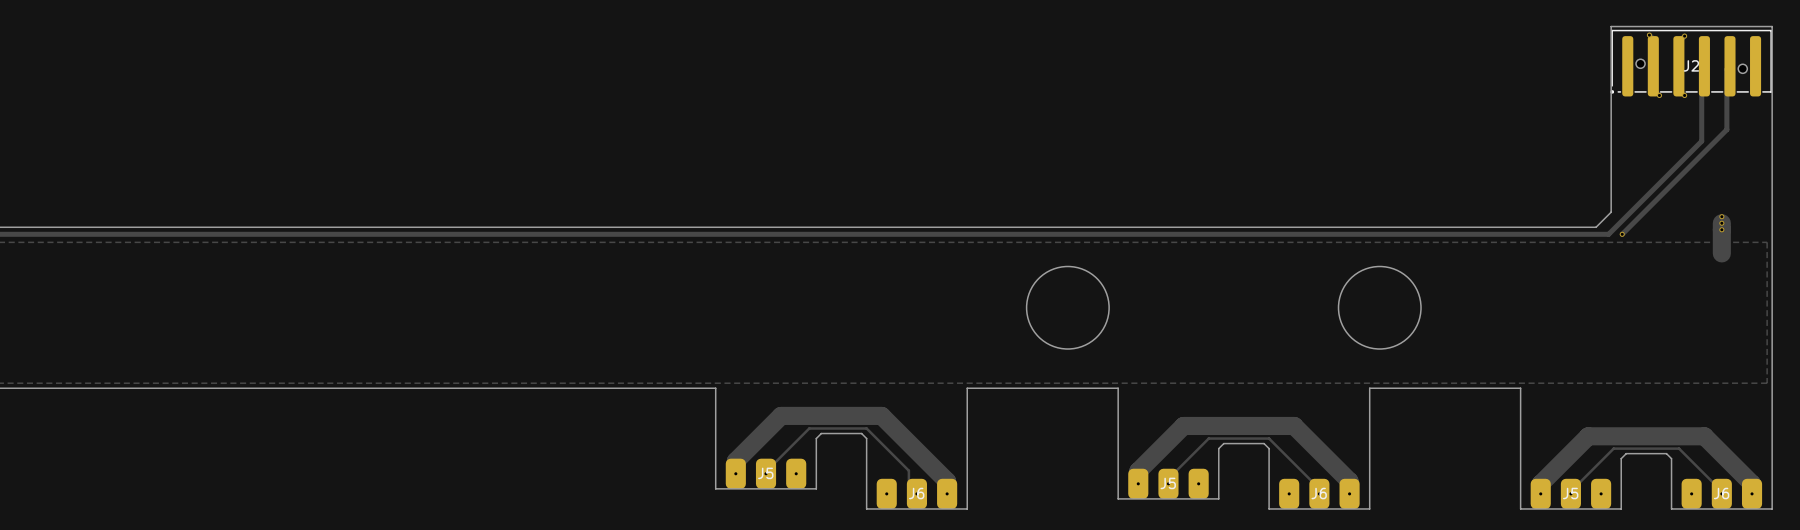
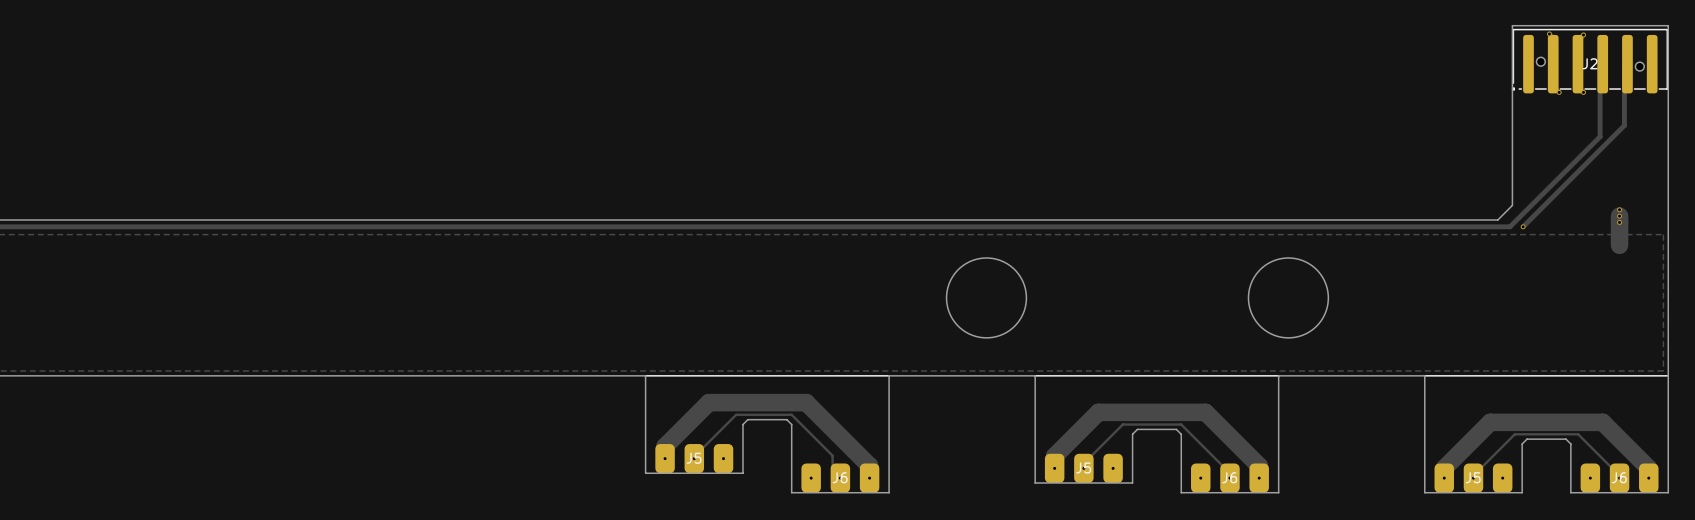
line: none -> (645, 375) (889, 375)
line: none -> (1035, 375) (1278, 375)
line: none -> (1424, 375) (1668, 375)

